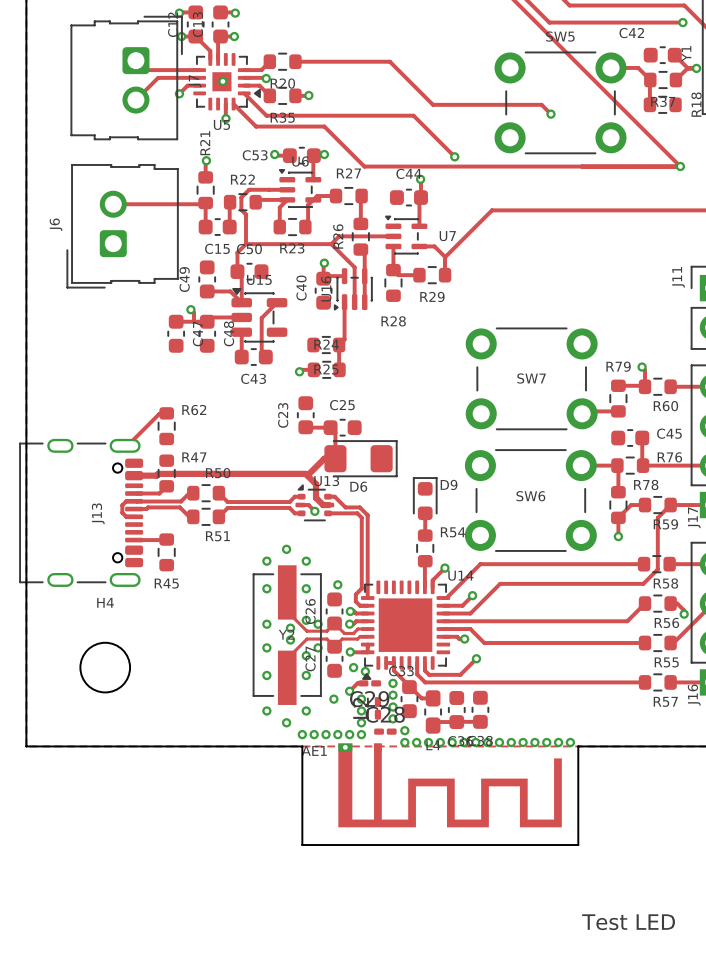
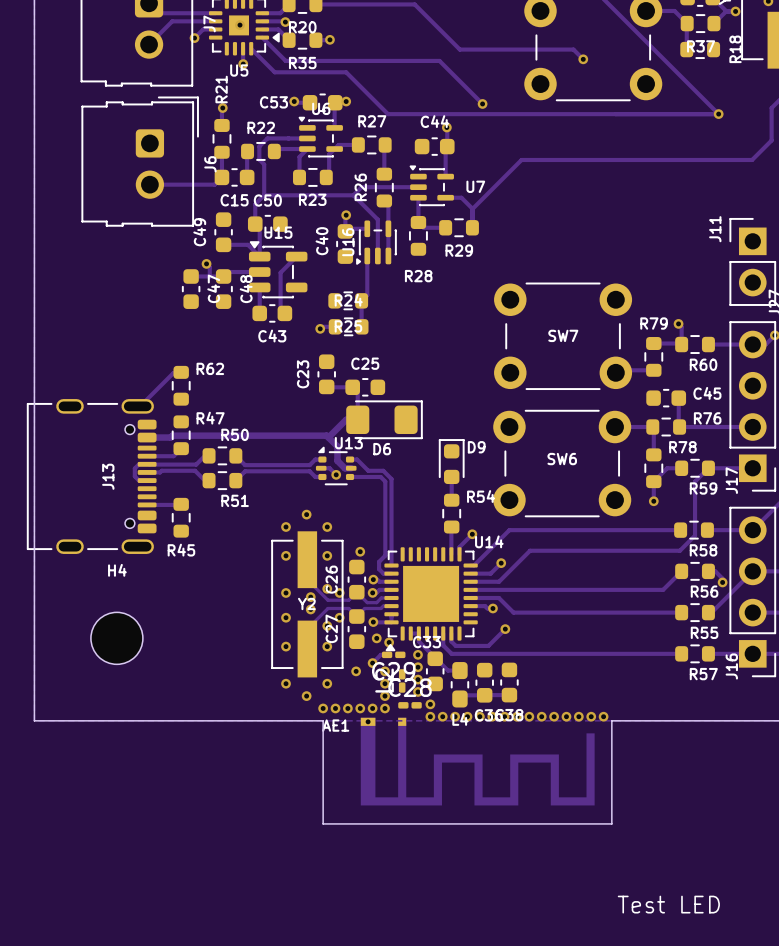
track: (113, 204) (204, 204) -> none
J6 rotation: 0° (122, 226) -> 180° (140, 161)
track: none -> (221, 177) (214, 184) (149, 184)

